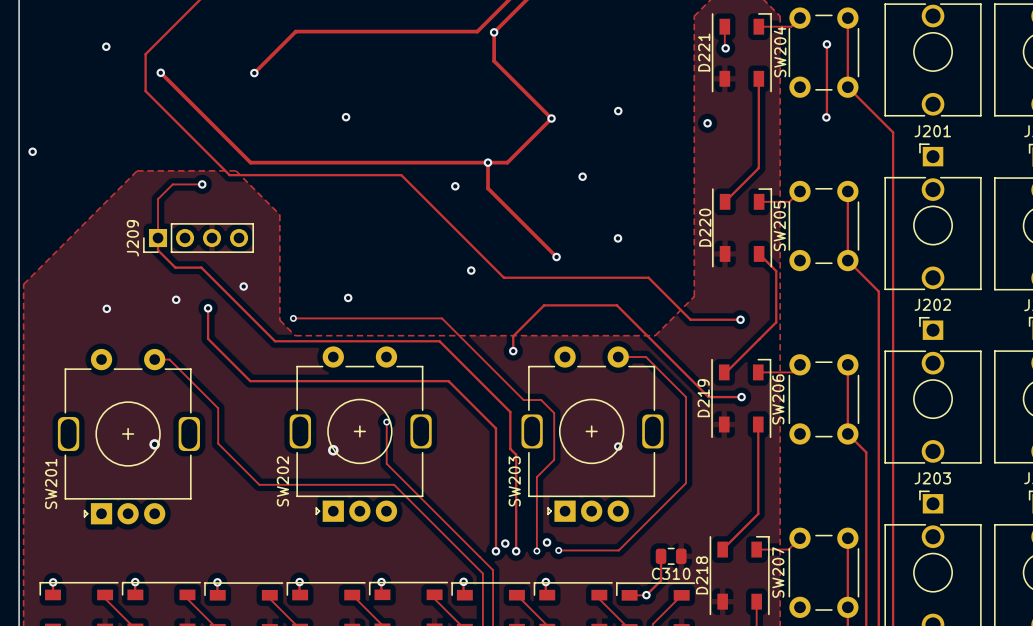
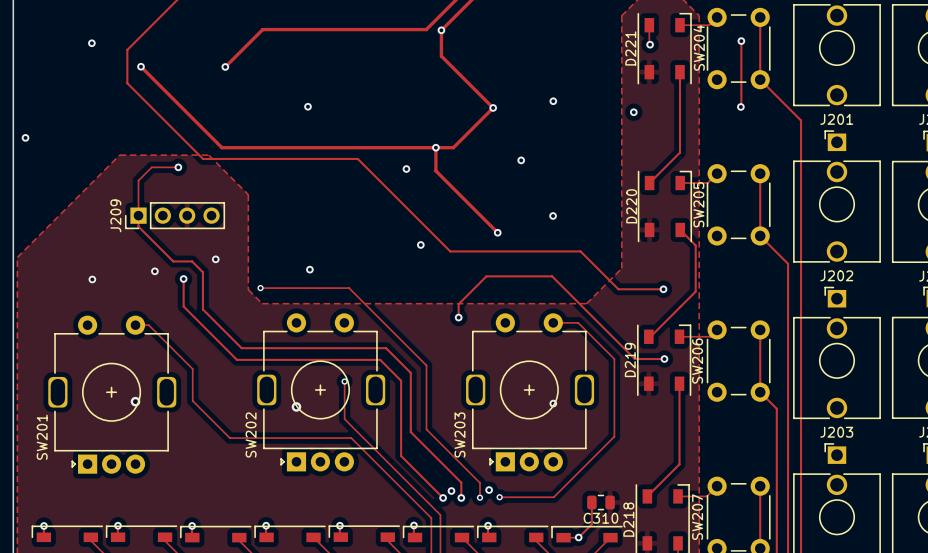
track: (175, 267) (201, 267) (275, 341) (439, 341) (510, 411) (510, 448) (516, 454) (516, 534) -> (154, 242) (173, 261) (192, 261) (202, 272) (202, 309) (241, 348) (386, 348) (410, 372) (410, 432) (461, 482)
track: (391, 318) (442, 318) (523, 400) (541, 400) (554, 413) (554, 459) (536, 477) (536, 534) -> (349, 288) (426, 365) (426, 429) (479, 482)
track: (250, 381) (448, 381) (495, 428) (495, 551) -> (221, 344) (236, 359) (380, 359) (401, 380) (401, 455) (443, 497)

